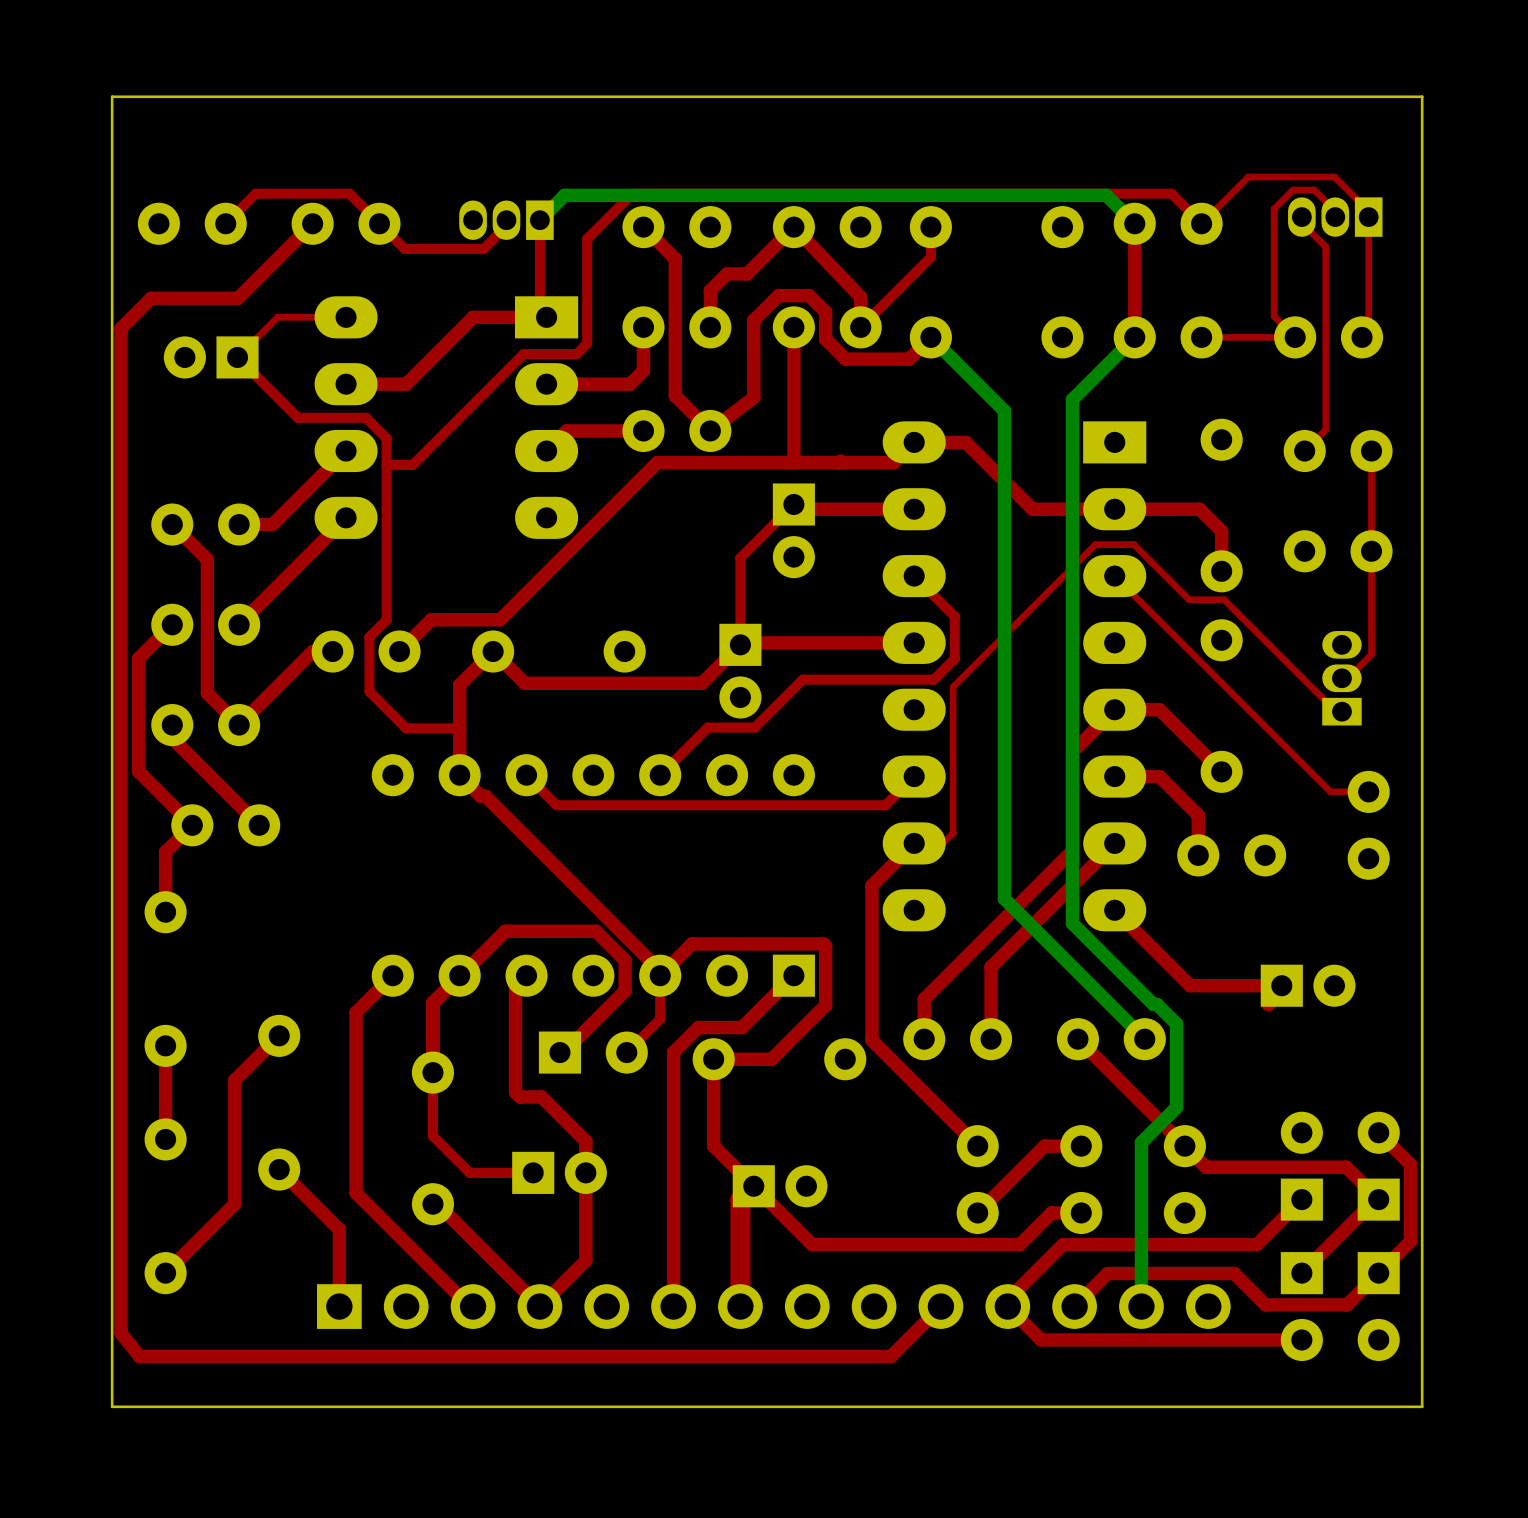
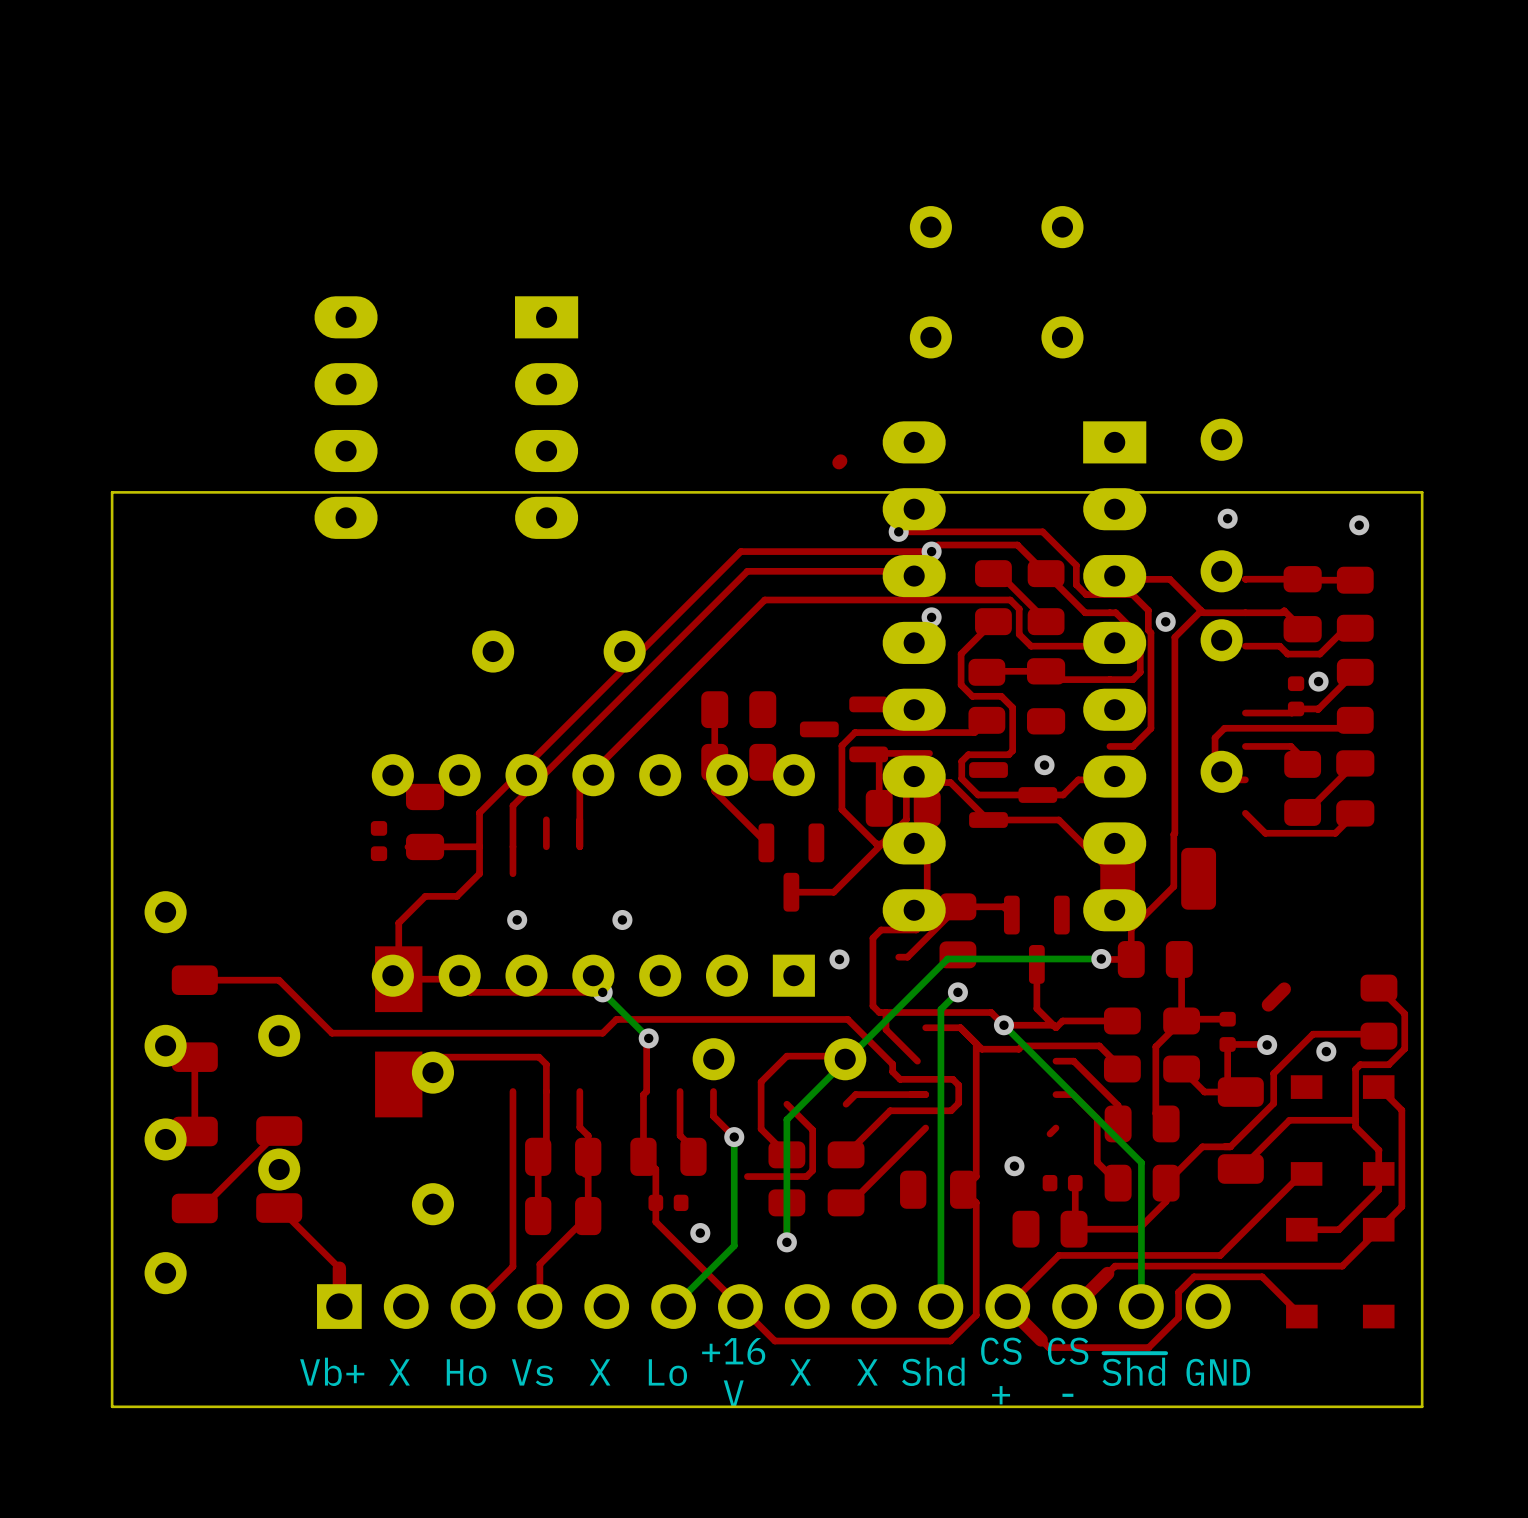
top track: (506, 214) (506, 226) (483, 248) (404, 248) (349, 193) (255, 193) (225, 223) -> none
top track: (1301, 217) (1301, 223) (1325, 246) (1325, 429) (1304, 451) -> none
top track: (1335, 217) (1335, 211) (1314, 189) (1293, 189) (1274, 208) (1274, 316) (1295, 337) (1201, 337) -> none
part: (1335, 217) -> none
part: (506, 220) -> none
top track: (539, 220) (539, 310) (546, 317) (473, 317) (406, 384) (346, 384) -> none
bottom track: (539, 220) (564, 195) (1106, 195) (1134, 223) -> none
part: (192, 223) -> none
top track: (312, 223) (238, 298) (151, 298) (121, 328) (121, 1333) (139, 1356) (890, 1356) (940, 1306) -> none
part: (346, 223) -> none
top track: (1134, 223) (1134, 337) -> none
part: (1168, 223) -> none
top track: (643, 227) (675, 258) (675, 395) (710, 430) (753, 397) (753, 320) (778, 295) (809, 295) (825, 312) (825, 339) (845, 359) (909, 359) (930, 337) -> none
part: (676, 227) -> none
part: (827, 227) -> none
top track: (930, 227) (930, 257) (860, 327) (860, 297) (793, 227) (747, 273) (727, 273) (710, 290) (710, 327) -> none
top track: (346, 317) (277, 317) (237, 357) (297, 417) (365, 417) (386, 438) (386, 619) (369, 637) (369, 691) (406, 728) (459, 728) -> none
top track: (643, 327) (643, 370) (630, 384) (546, 384) -> none
part: (676, 327) -> none
top track: (793, 327) (793, 461) (792, 462) -> none
part: (827, 327) -> none
bottom track: (930, 337) (1004, 410) (1004, 898) (1144, 1039) -> none
bottom track: (1134, 337) (1072, 399) (1072, 923) (1153, 1004) (1156, 1004) (1176, 1023) (1176, 1107) (1141, 1142) (1141, 1162) -> (1003, 1025) (1141, 1162)
part: (1168, 337) -> none
part: (1328, 337) -> none
top track: (1362, 337) (1368, 330) (1368, 211) (1334, 176) (1248, 176) (1201, 223) (1171, 193) (632, 193) (587, 238) (587, 343) (576, 354) (523, 354) (412, 464) (386, 464) -> none
part: (211, 357) -> none
top track: (643, 430) (566, 430) (546, 451) -> none
part: (676, 430) -> none
top track: (346, 451) (272, 524) (239, 524) -> none
part: (1338, 451) -> none
top track: (1371, 451) (1371, 654) (1347, 678) (1341, 678) -> none
board edge: (1422, 492) (1422, 96) (112, 96) (112, 492) -> (1422, 492) (112, 492)
top track: (914, 509) (798, 509) (793, 504) (740, 557) (740, 644) -> none
top track: (346, 517) (239, 624) -> none
via: none -> (1227, 518)
top track: (172, 524) (207, 559) (207, 693) (239, 725) (312, 651) (332, 651) -> none
part: (205, 524) -> none
via: none -> (1359, 525)
part: (793, 530) -> none
top track: none -> (898, 531) (1042, 531) (1076, 565) (1076, 584) (1086, 594) (1132, 594) (1148, 610) (1148, 630) (1150, 632) (1150, 728) (1132, 746) (1109, 746)
via: none -> (898, 531)
via: none -> (931, 551)
part: (1338, 551) -> none
top track: none -> (898, 571) (747, 571) (512, 805) (512, 873)
top track: (1221, 571) (1221, 531) (1199, 509) (1032, 509) (965, 442) (914, 442) (893, 462) (657, 462) (500, 619) (431, 619) (399, 651) -> none
top track: none -> (993, 573) (999, 573) (1046, 621)
top track: (914, 576) (954, 616) (954, 658) (933, 679) (802, 679) (754, 727) (707, 727) (660, 775) -> none
top track: (1114, 576) (1330, 791) (1368, 791) -> none
top track: none -> (1109, 579) (1169, 579) (1203, 612) (1282, 612) (1284, 610) (1302, 629)
top track: none -> (1245, 579) (1355, 580)
part: none -> (993, 597)
part: none -> (1046, 597)
part: none -> (1302, 604)
part: none -> (1355, 604)
top track: none -> (1201, 610) (1174, 637) (1173, 886) (1131, 929) (1131, 959) (1101, 958)
top track: none -> (987, 615) (993, 621) (961, 654) (961, 684) (972, 696) (1001, 696) (1012, 707) (1012, 750) (1008, 754) (968, 754) (961, 761) (961, 778) (978, 795) (1063, 795) (1078, 779) (1109, 779)
via: none -> (931, 617)
via: none -> (1165, 621)
top track: (172, 624) (138, 658) (138, 771) (192, 825) (165, 852) (165, 912) -> none
part: (205, 624) -> none
top track: none -> (1355, 628) (1345, 628) (1319, 654) (1287, 654) (1279, 646) (1245, 646)
part footprint: [1322, 631, 1362, 726] -> [1336, 658, 1374, 734]
top track: (914, 642) (742, 642) (701, 683) (524, 683) (493, 651) (459, 684) (459, 775) (480, 796) (485, 796) (660, 970) (660, 975) -> none
top track: none -> (1109, 646) (1031, 646) (1019, 634) (1019, 608) (1010, 600) (764, 600) (579, 784) (579, 846)
part: (366, 651) -> none
part: (740, 671) -> none
top track: none -> (986, 672) (1046, 671) (1054, 679) (1132, 679) (1140, 672) (1140, 637) (1115, 612) (1085, 612) (1017, 545) (938, 545) (931, 551) (740, 551) (479, 812) (479, 873) (456, 896) (425, 896) (398, 923) (398, 979) (456, 979) (470, 992) (602, 992)
top track: none -> (1355, 672) (1318, 709) (1296, 708) (1291, 713) (1245, 713)
via: none -> (1318, 681)
part: none -> (986, 696)
part: none -> (1046, 696)
part: none -> (1296, 696)
top track: none -> (714, 709) (714, 791) (766, 842)
part: none -> (738, 709)
top track: (1341, 711) (1336, 711) (1224, 599) (1189, 599) (1133, 544) (1095, 544) (953, 686) (953, 833) (942, 843) (914, 843) (871, 885) (871, 1040) (977, 1146) -> none
top track: none -> (986, 720) (974, 732) (855, 732) (841, 745) (841, 809) (876, 844) (881, 844)
top track: none -> (1355, 720) (1347, 728) (1224, 728) (1215, 737) (1215, 769) (1225, 779) (1245, 779)
top track: (172, 725) (172, 738) (259, 825) -> none
part: (205, 725) -> none
part: none -> (844, 729)
top track: none -> (1245, 746) (1290, 746) (1302, 758) (1302, 764)
top track: none -> (929, 753) (868, 754) (879, 755) (879, 808)
part: none -> (738, 762)
top track: none -> (1355, 763) (1306, 812) (1302, 812)
via: none -> (1044, 765)
top track: (1221, 771) (1159, 709) (1114, 709) (1072, 752) (1072, 850) (924, 999) (924, 1039) -> none
top track: (526, 775) (556, 805) (885, 805) (914, 776) -> none
top track: (1114, 776) (1159, 776) (1198, 815) (1198, 855) -> none
part: none -> (1302, 788)
part: none -> (1355, 788)
part: none -> (1013, 795)
part: none -> (903, 808)
top track: none -> (927, 808) (927, 919) (916, 929) (881, 929) (872, 938) (872, 1006) (879, 1012) (991, 1012) (1003, 1025) (1053, 1025)
top track: none -> (1245, 813) (1265, 833) (1335, 833) (1355, 813)
top track: none -> (546, 819) (546, 846)
part: none -> (425, 821)
part: (225, 825) -> none
part: (1368, 825) -> none
part: none -> (379, 841)
top track: (1114, 843) (991, 967) (991, 1039) -> none
top track: none -> (479, 846) (407, 846)
part: (1231, 855) -> none
part: none -> (791, 867)
top track: none -> (1117, 878) (1058, 820) (988, 820) (950, 782) (914, 782) (906, 790) (906, 819) (833, 892) (791, 892)
part: none -> (1158, 878)
top track: (1114, 910) (1190, 985) (1281, 985) -> none
top track: none -> (1011, 915) (1003, 906) (957, 906) (907, 957) (898, 957)
via: none -> (517, 919)
via: none -> (622, 919)
part: none -> (957, 930)
part: none -> (1036, 939)
bottom track: none -> (1101, 958) (947, 958) (786, 1119) (786, 1242)
via: none -> (1101, 958)
via: none -> (839, 959)
part: none -> (1155, 959)
top track: none -> (1179, 959) (1181, 961) (1181, 1020)
top track: none -> (1036, 964) (1036, 1008) (1055, 1027) (1062, 1020) (1122, 1020)
top track: (392, 975) (356, 1012) (356, 1193) (469, 1306) (473, 1306) -> (512, 1091) (512, 1266) (473, 1306)
top track: (459, 975) (432, 1002) (432, 1136) (469, 1172) (533, 1172) -> none
top track: (538, 975) (526, 975) (515, 986) (515, 1092) (520, 1097) (541, 1097) (585, 1141) (585, 1260) (539, 1306) (437, 1204) (432, 1204) -> none
top track: (660, 975) (691, 943) (823, 943) (825, 946) (825, 1005) (771, 1059) (713, 1059) -> none
top track: (660, 975) (660, 1019) (626, 1052) -> none
top track: (793, 975) (742, 1027) (698, 1027) (673, 1052) (673, 1299) -> none
top track: none -> (194, 980) (279, 980) (332, 1033) (602, 1033) (616, 1019) (847, 1019) (892, 1064) (892, 1071) (900, 1079) (952, 1079) (958, 1085) (958, 1103) (951, 1110) (890, 1110) (846, 1154)
part: (1308, 985) -> none
top track: none -> (1378, 988) (1404, 1013) (1404, 1048) (1388, 1064) (1360, 1064) (1355, 1069) (1355, 1126) (1378, 1150)
bottom track: none -> (602, 992) (648, 1038)
via: none -> (602, 992)
bottom track: none -> (957, 992) (940, 1009) (940, 1306)
via: none -> (957, 992)
top track: (432, 1003) (505, 931) (595, 931) (625, 960) (625, 990) (563, 1052) (559, 1052) -> none
top track: none -> (885, 1012) (885, 1029) (917, 1061)
part: none -> (1378, 1012)
part: none -> (194, 1018)
part footprint: [1056, 1018, 1166, 1061] -> [1103, 1007, 1141, 1083]
top track: none -> (1227, 1019) (1183, 1019) (1155, 1046) (1155, 1113) (1166, 1123)
via: none -> (1003, 1025)
top track: none -> (925, 1027) (960, 1027) (981, 1049) (1018, 1049) (1022, 1045) (1099, 1045) (1122, 1069)
part: none -> (398, 1031)
part: none -> (1227, 1031)
top track: (279, 1035) (234, 1080) (234, 1203) (165, 1273) -> none
top track: none -> (1378, 1036) (1377, 1034) (1313, 1034) (1273, 1073) (1273, 1103) (1230, 1146) (1202, 1146) (1166, 1183) (1166, 1201) (1138, 1229) (1074, 1229) (1075, 1183)
top track: none -> (648, 1038) (646, 1040) (646, 1091) (643, 1094) (643, 1156) (655, 1169) (655, 1221) (774, 1341) (950, 1341) (976, 1315) (976, 1202) (963, 1189) (976, 1176) (976, 1043)
via: none -> (648, 1038)
part: (957, 1039) -> none
top track: (1077, 1039) (1205, 1167) (1346, 1167) (1378, 1199) (1375, 1199) (1301, 1273) (1301, 1263) -> none
part: none -> (1181, 1044)
top track: none -> (1267, 1044) (1227, 1044) (1227, 1085) (1234, 1092) (1204, 1092) (1181, 1069)
via: none -> (1267, 1044)
top track: (165, 1045) (165, 1139) -> none
via: none -> (1326, 1051)
part: (593, 1052) -> none
top track: none -> (846, 1056) (786, 1056) (761, 1081) (761, 1129) (786, 1154)
top track: none -> (194, 1057) (194, 1131)
top track: (713, 1059) (713, 1146) (812, 1244) (1019, 1244) (1051, 1212) (1081, 1212) -> none
top track: none -> (1055, 1061) (1073, 1061) (1118, 1105) (1118, 1123)
top track: none -> (398, 1084) (426, 1057) (539, 1057) (546, 1064) (546, 1148) (538, 1156) (538, 1216)
top track: none -> (579, 1091) (579, 1127) (588, 1135) (588, 1216) (539, 1264) (539, 1306)
top track: none -> (680, 1091) (680, 1135) (693, 1148) (693, 1156)
top track: none -> (713, 1091) (713, 1116) (734, 1137)
top track: none -> (925, 1094) (855, 1094) (846, 1104)
top track: none -> (1055, 1094) (1073, 1094) (1097, 1118) (1097, 1162) (1118, 1183)
top track: none -> (786, 1104) (812, 1129) (812, 1170) (806, 1176) (747, 1176)
top track: none -> (1355, 1120) (1289, 1120) (1240, 1168)
part: none -> (1142, 1123)
part footprint: [1060, 1125, 1103, 1235] -> [1042, 1174, 1083, 1192]
top track: none -> (925, 1128) (850, 1202) (846, 1202)
top track: none -> (1055, 1128) (1050, 1133)
part: none -> (1240, 1130)
part: none -> (1306, 1130)
part: none -> (1378, 1130)
top track: none -> (279, 1131) (201, 1208) (194, 1208)
top track: (1378, 1132) (1410, 1164) (1410, 1241) (1346, 1304) (1265, 1304) (1234, 1273) (1107, 1273) -> (1378, 1087) (1401, 1110) (1401, 1206) (1342, 1266) (1115, 1266) (1107, 1273)
bottom track: none -> (734, 1137) (734, 1245) (673, 1306)
via: none -> (734, 1137)
top track: (1081, 1146) (1044, 1146) (977, 1212) -> none
top track: none -> (1378, 1150) (1378, 1189) (1338, 1229) (1301, 1229)
part footprint: [512, 1151, 607, 1194] -> [525, 1137, 602, 1176]
part: none -> (668, 1156)
bottom track width: thick (1141, 1162) (1141, 1299) -> thin (1141, 1162) (1141, 1299)
part footprint: [732, 1165, 828, 1208] -> [768, 1141, 806, 1217]
via: none -> (1014, 1166)
part: (1301, 1166) -> none
part: (1378, 1166) -> none
part: none -> (194, 1169)
top track: (279, 1169) (339, 1229) (339, 1268) -> (279, 1208) (339, 1268)
part: none -> (279, 1169)
top track: none -> (1301, 1173) (1220, 1255) (1058, 1255) (1007, 1306)
part: none -> (846, 1178)
part: (977, 1179) -> none
part: (1184, 1179) -> none
part: none -> (1142, 1183)
top track: (753, 1186) (740, 1199) (740, 1306) -> none
part: none -> (938, 1189)
top track: (1301, 1199) (1256, 1244) (1062, 1244) (1007, 1299) -> none
part: none -> (668, 1202)
part: none -> (563, 1216)
part: none -> (1050, 1229)
via: none -> (700, 1233)
via: none -> (786, 1242)
part: none -> (1301, 1273)
part: none -> (1378, 1273)
part: (1301, 1306) -> none
part: (1378, 1306) -> none
top track: (1301, 1339) (1041, 1339) -> (1301, 1316) (1262, 1276) (1194, 1276) (1178, 1292) (1178, 1317) (1148, 1347) (1048, 1347) (1041, 1339)
text: none -> +16 (733, 1351)
text: none -> CS (1001, 1351)
text: none -> CS (1068, 1351)
text: none -> ~{Shd} (1134, 1369)
text: none -> Vb+ (332, 1371)
text: none -> Shd (933, 1371)
text: none -> X (399, 1372)
text: none -> Ho (466, 1372)
text: none -> Vs (532, 1372)
text: none -> X (600, 1372)
text: none -> Lo (667, 1372)
text: none -> X (800, 1372)
text: none -> X (867, 1372)
text: none -> GND (1218, 1372)
text: none -> V (733, 1393)
text: none -> + (1001, 1395)
text: none -> - (1067, 1395)

